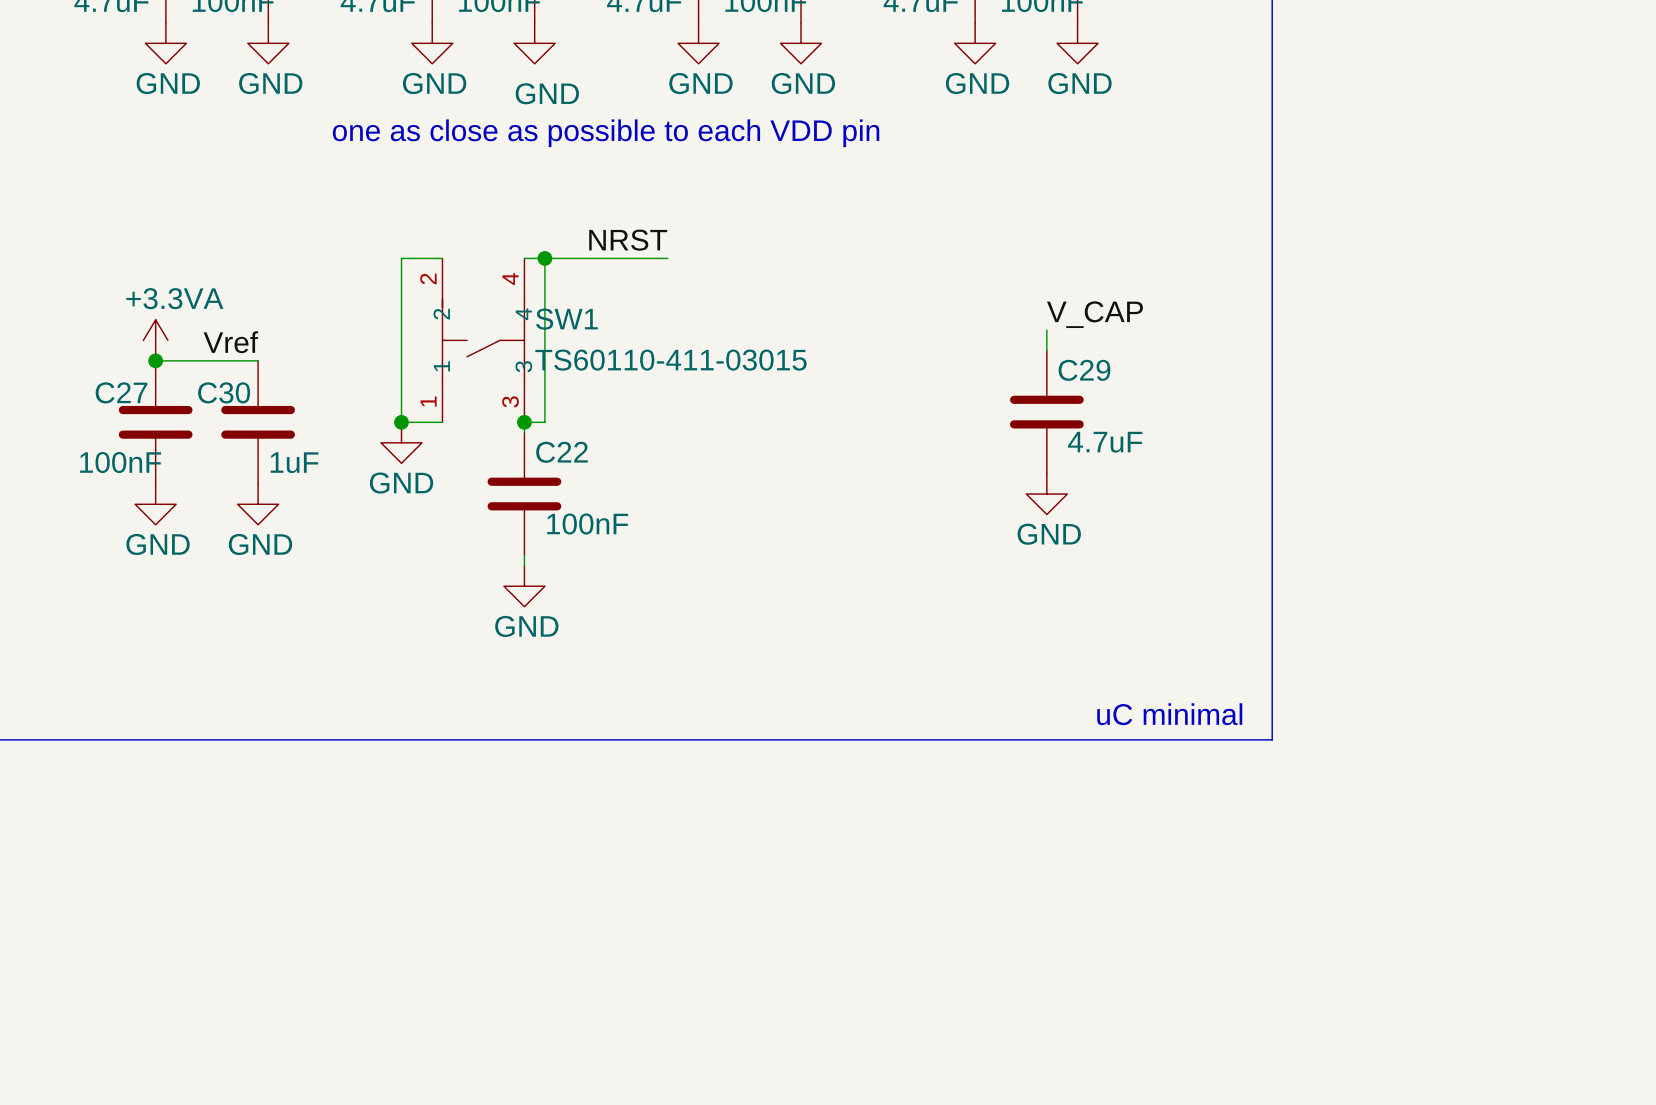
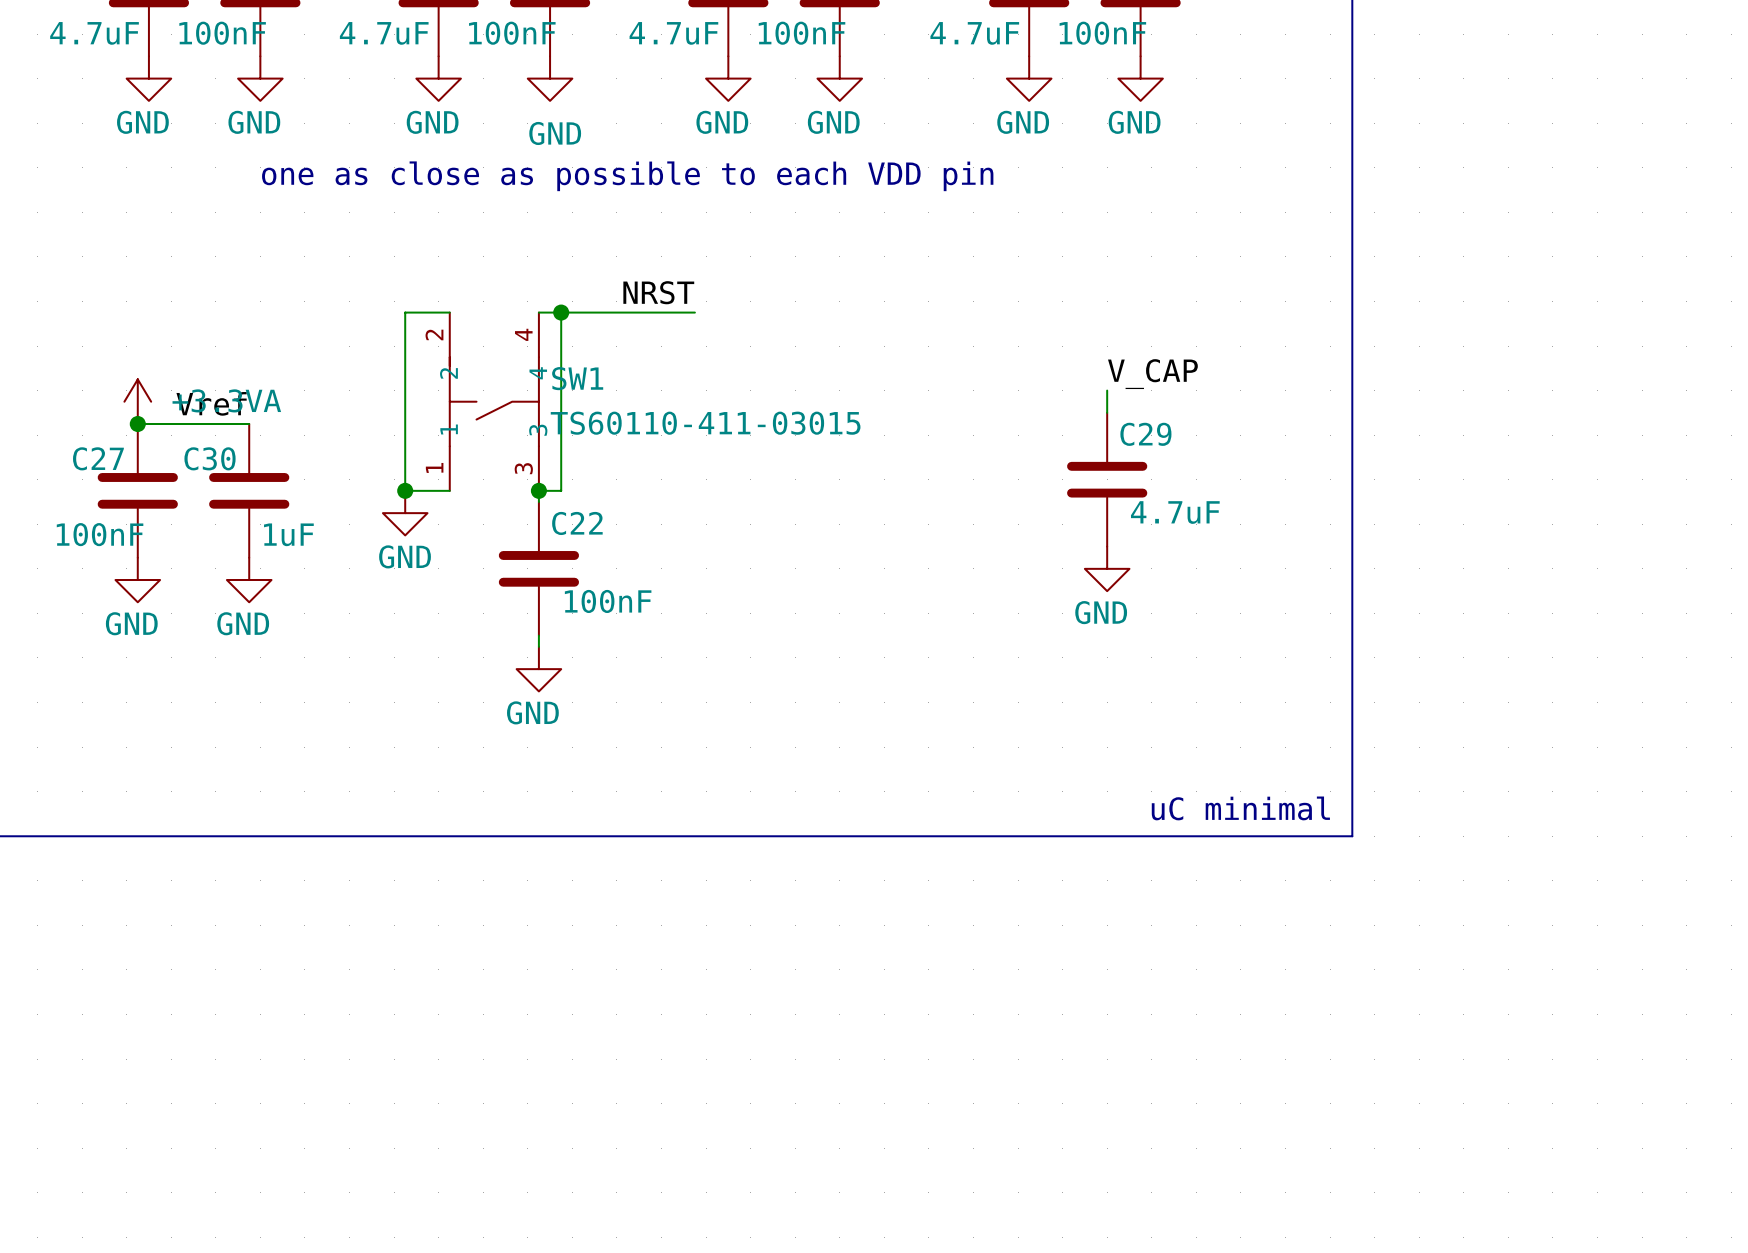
power symbol text position: +3.3VA (174, 298) -> +3.3VA (226, 400)

